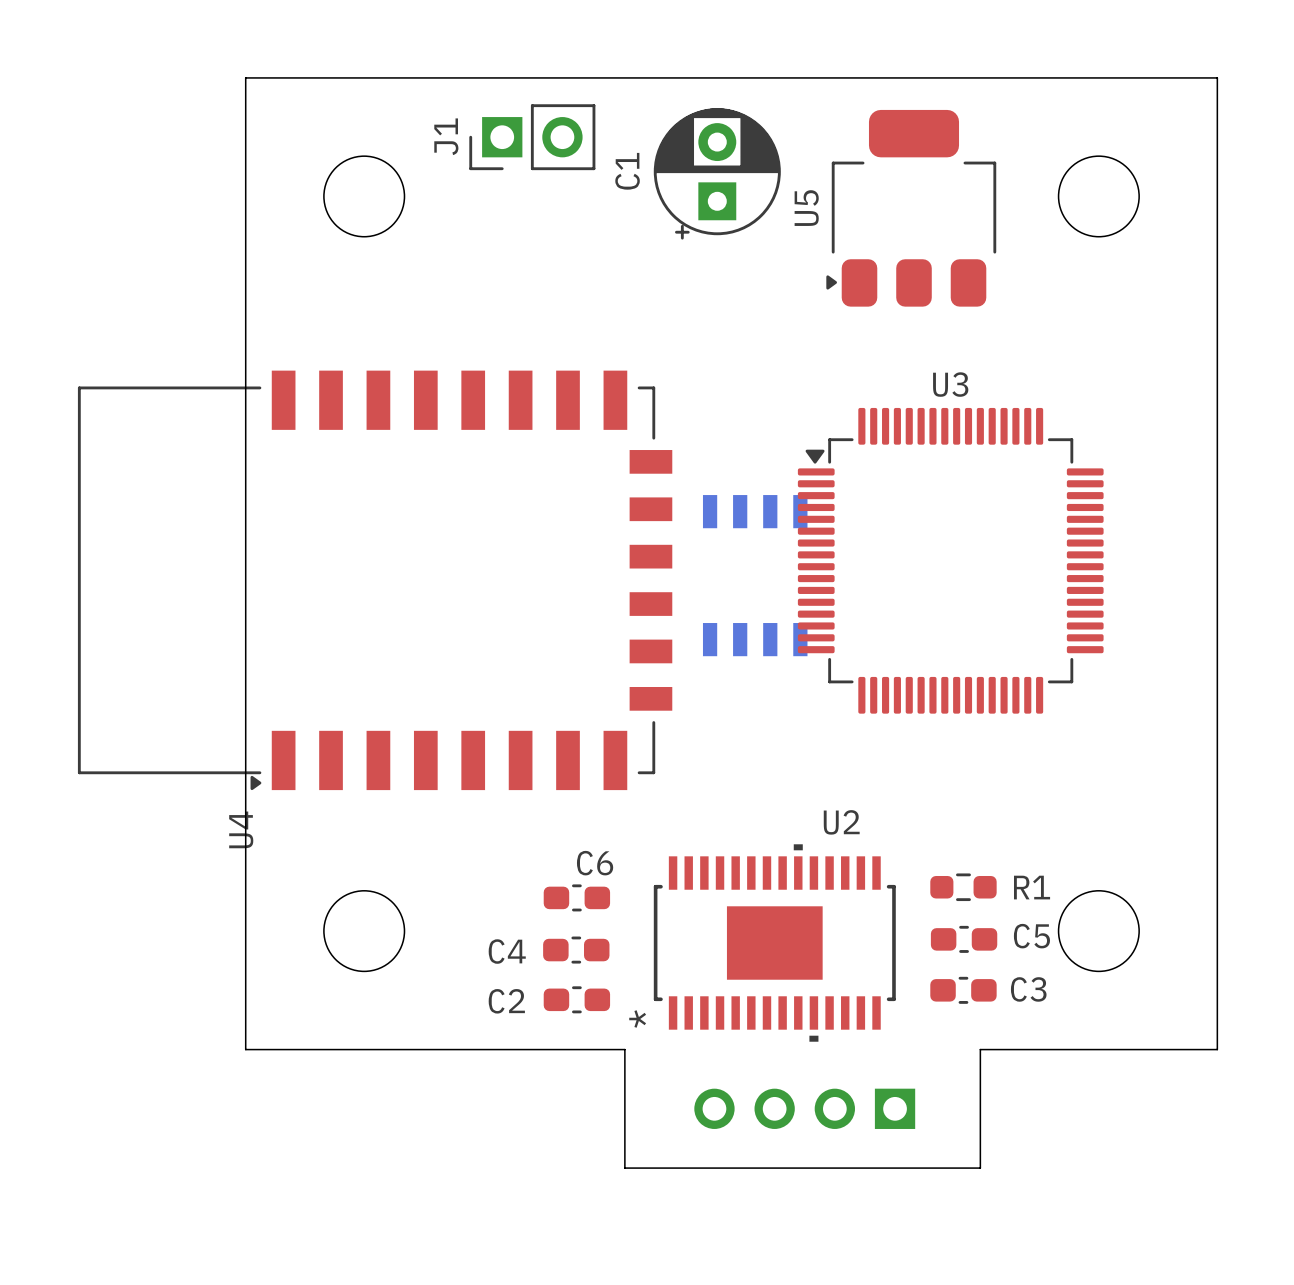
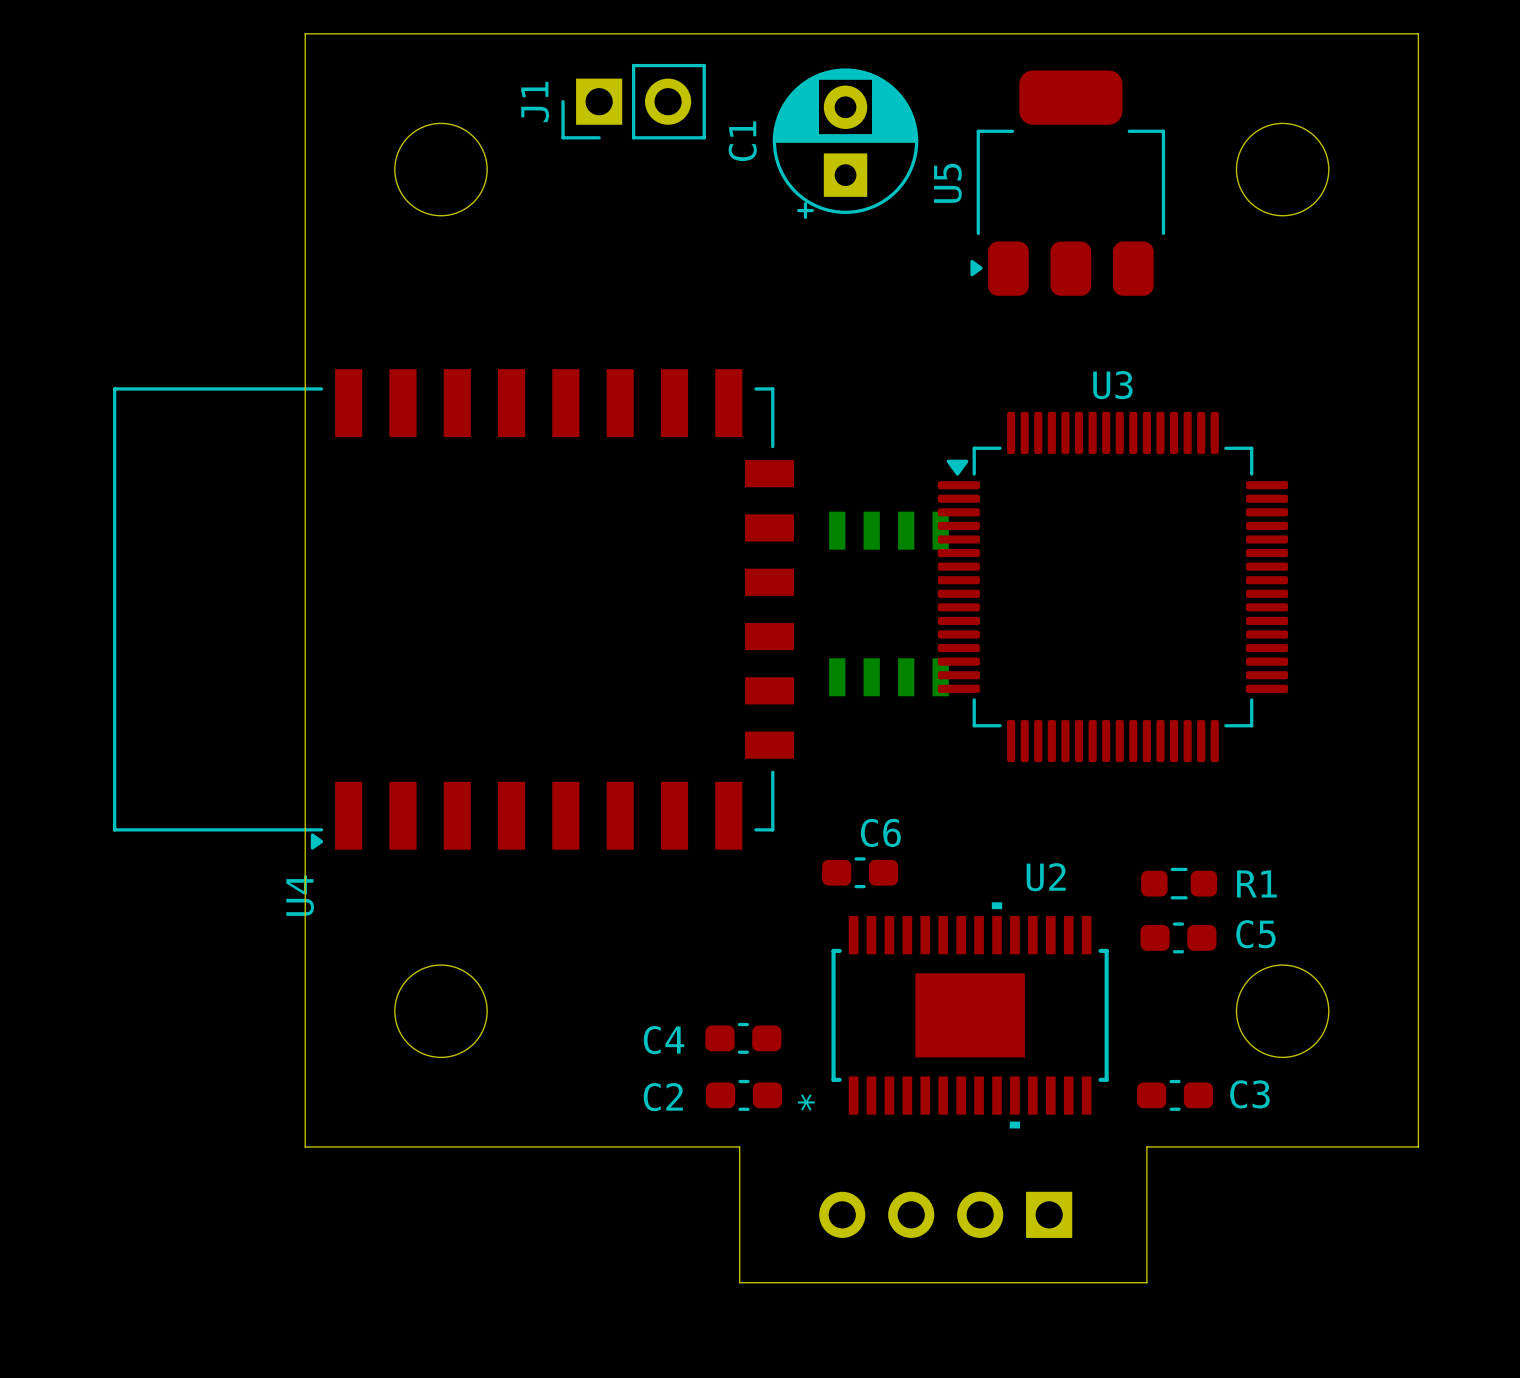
R1 position: (963, 887) -> (1179, 883)
C6 position: (576, 897) -> (860, 872)
C5 position: (964, 939) -> (1178, 937)
U2 position: (774, 943) -> (970, 1015)
C4 position: (576, 950) -> (743, 1038)
C3 position: (963, 990) -> (1175, 1095)
C2 position: (576, 999) -> (744, 1095)

